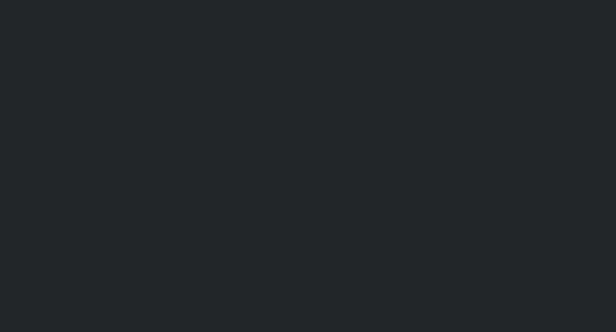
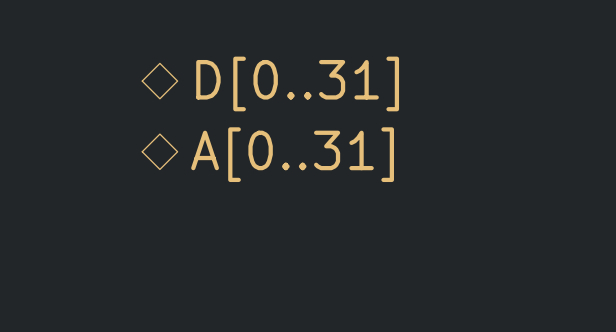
hierarchical label: none -> D[0..31] (297, 83)
hierarchical label: none -> A[0..31] (292, 154)

